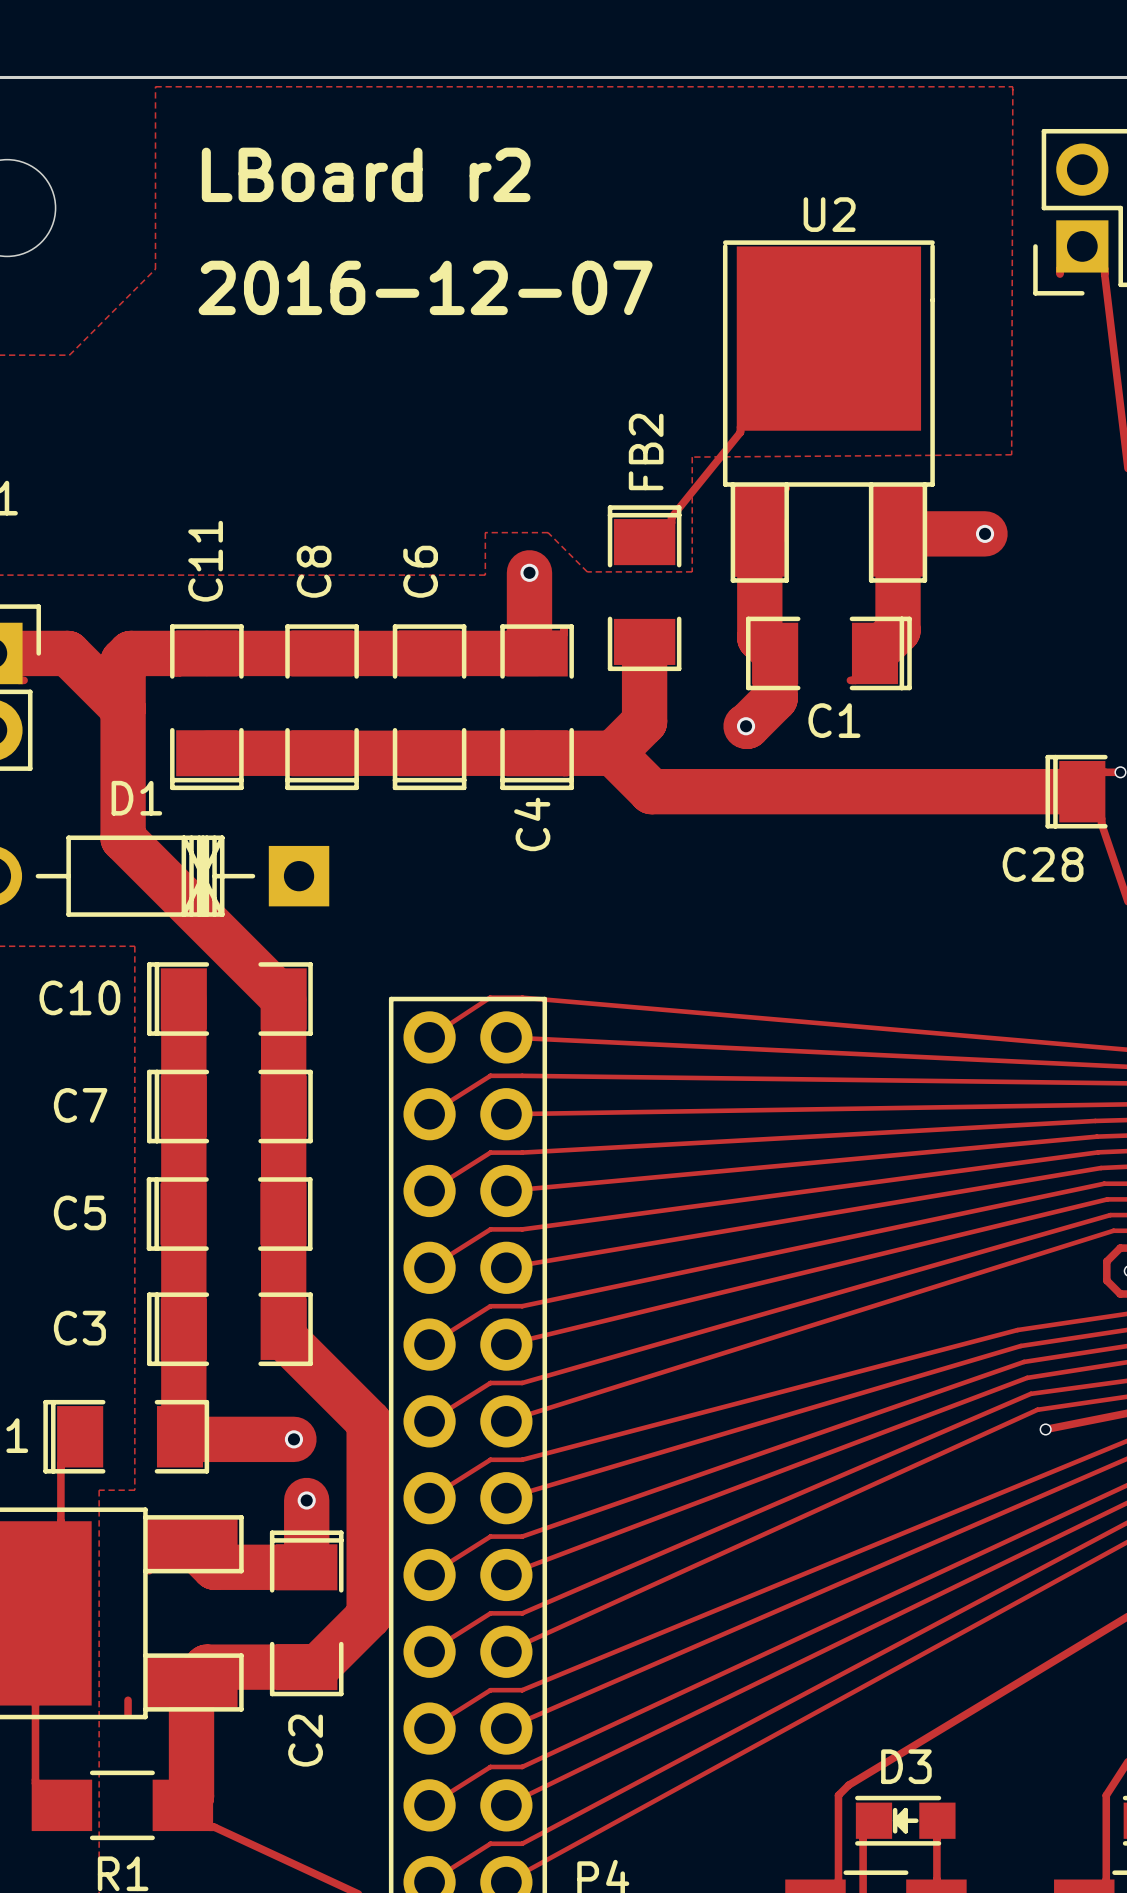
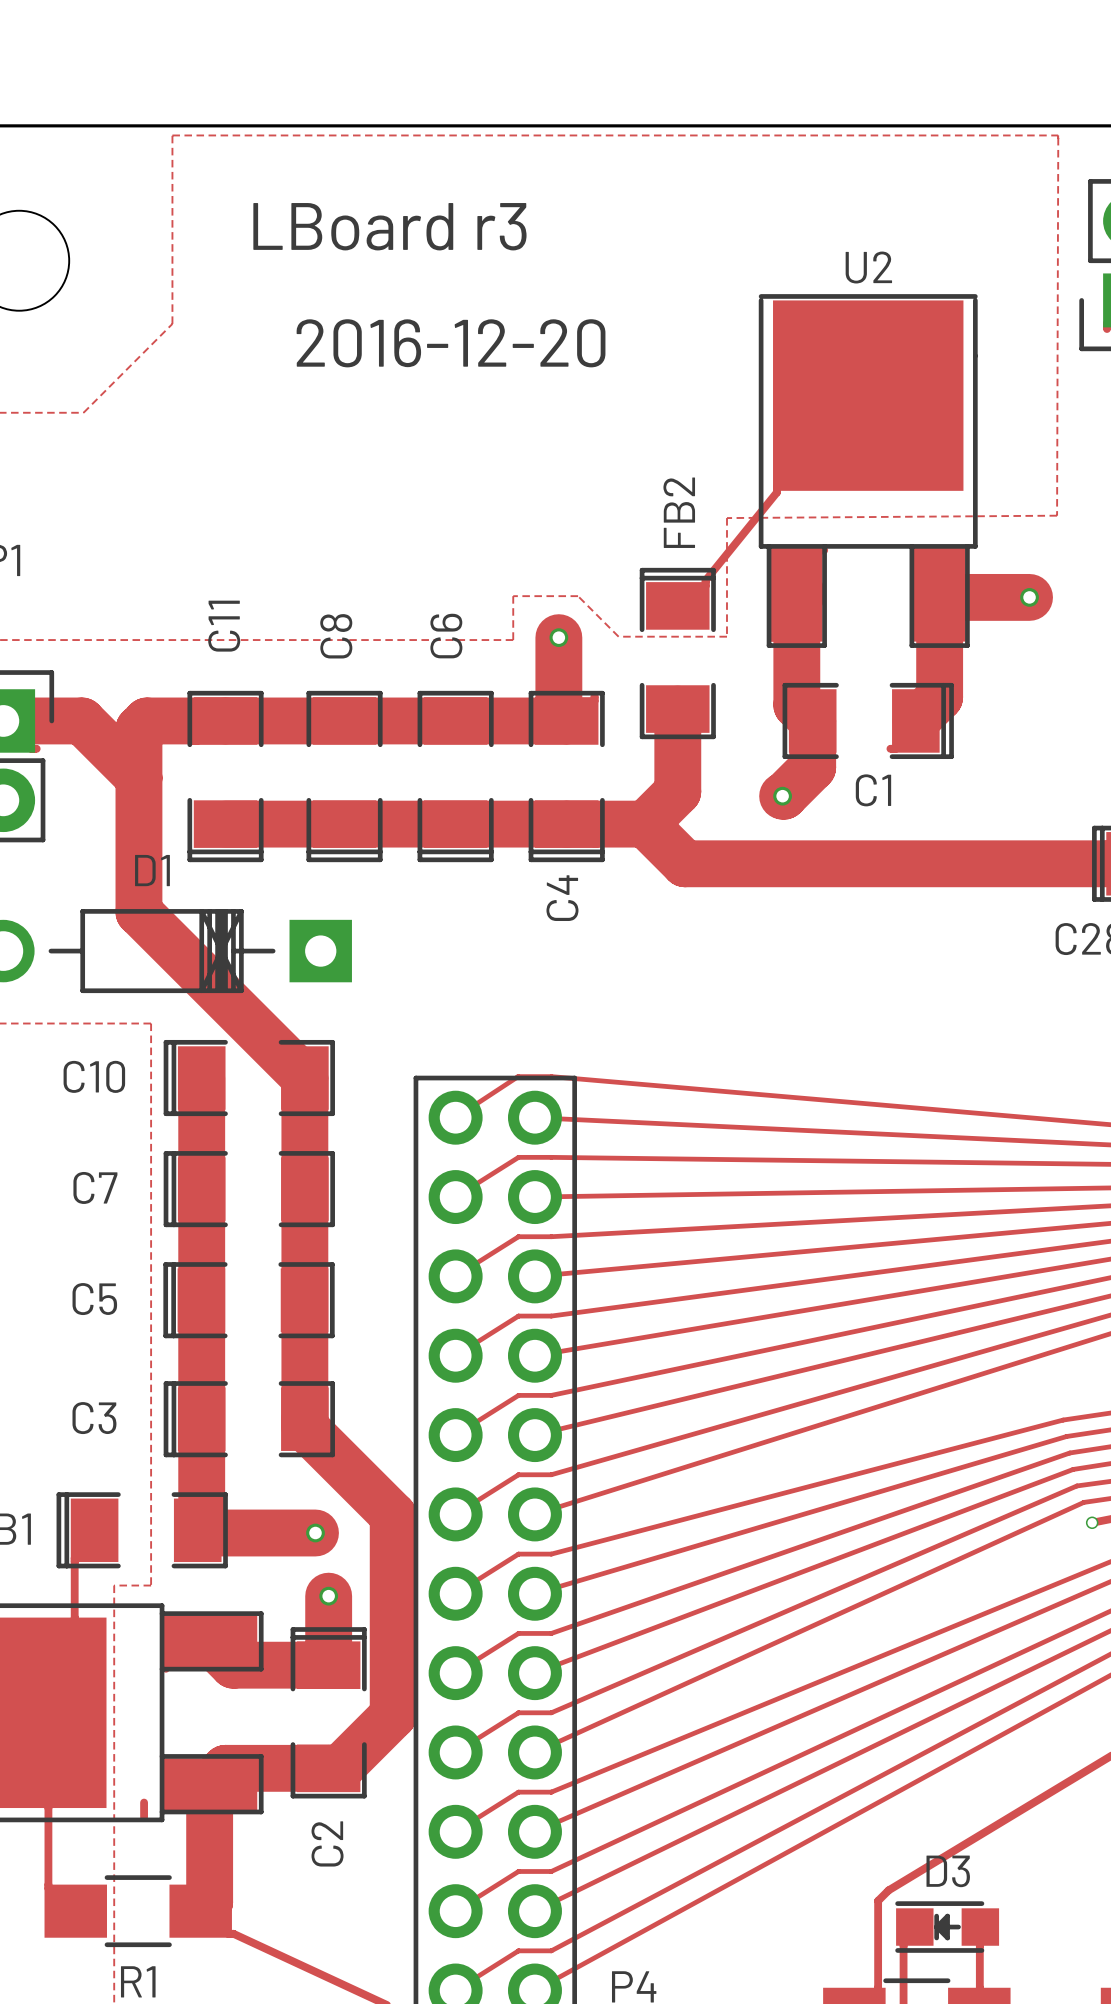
text: LBoard r2 (366, 174) -> LBoard r3 (389, 226)
text: 2016-12-07 (425, 287) -> 2016-12-20 (451, 343)

